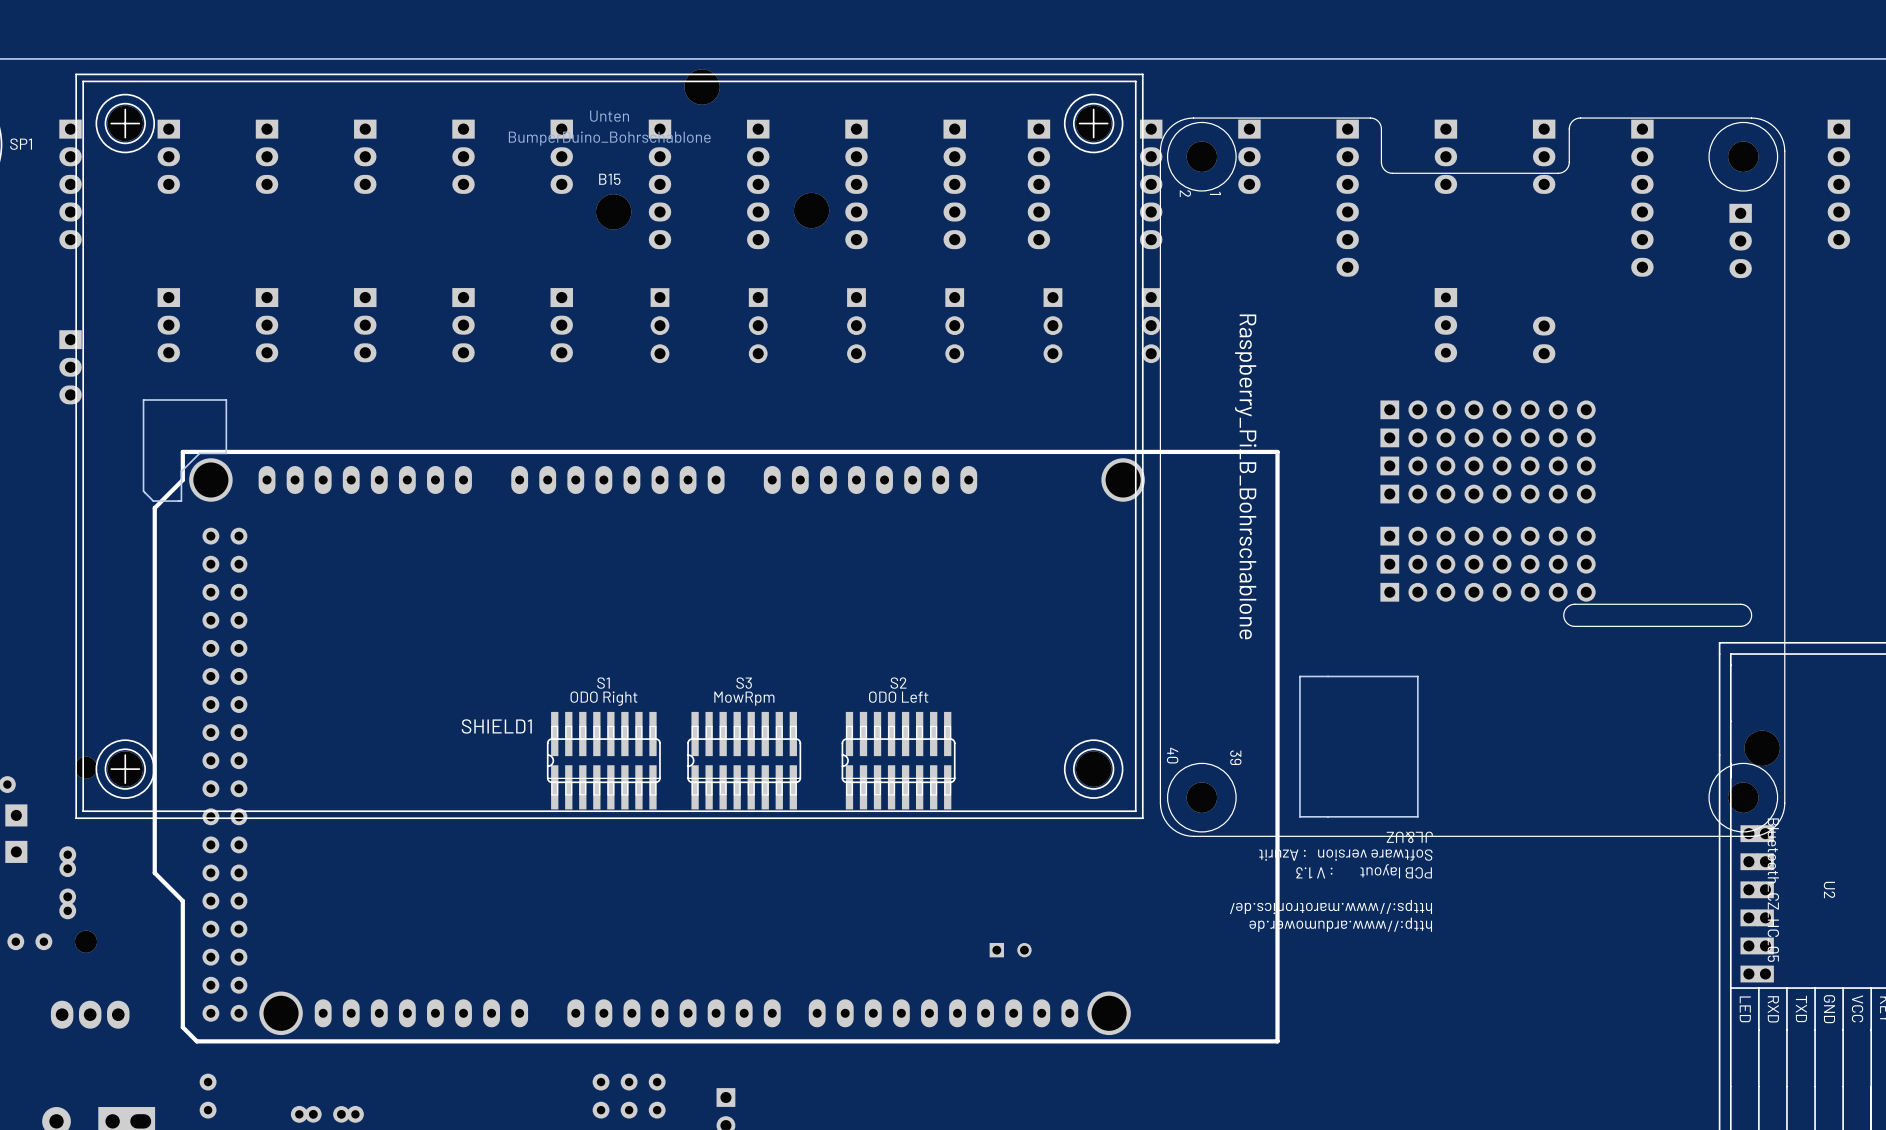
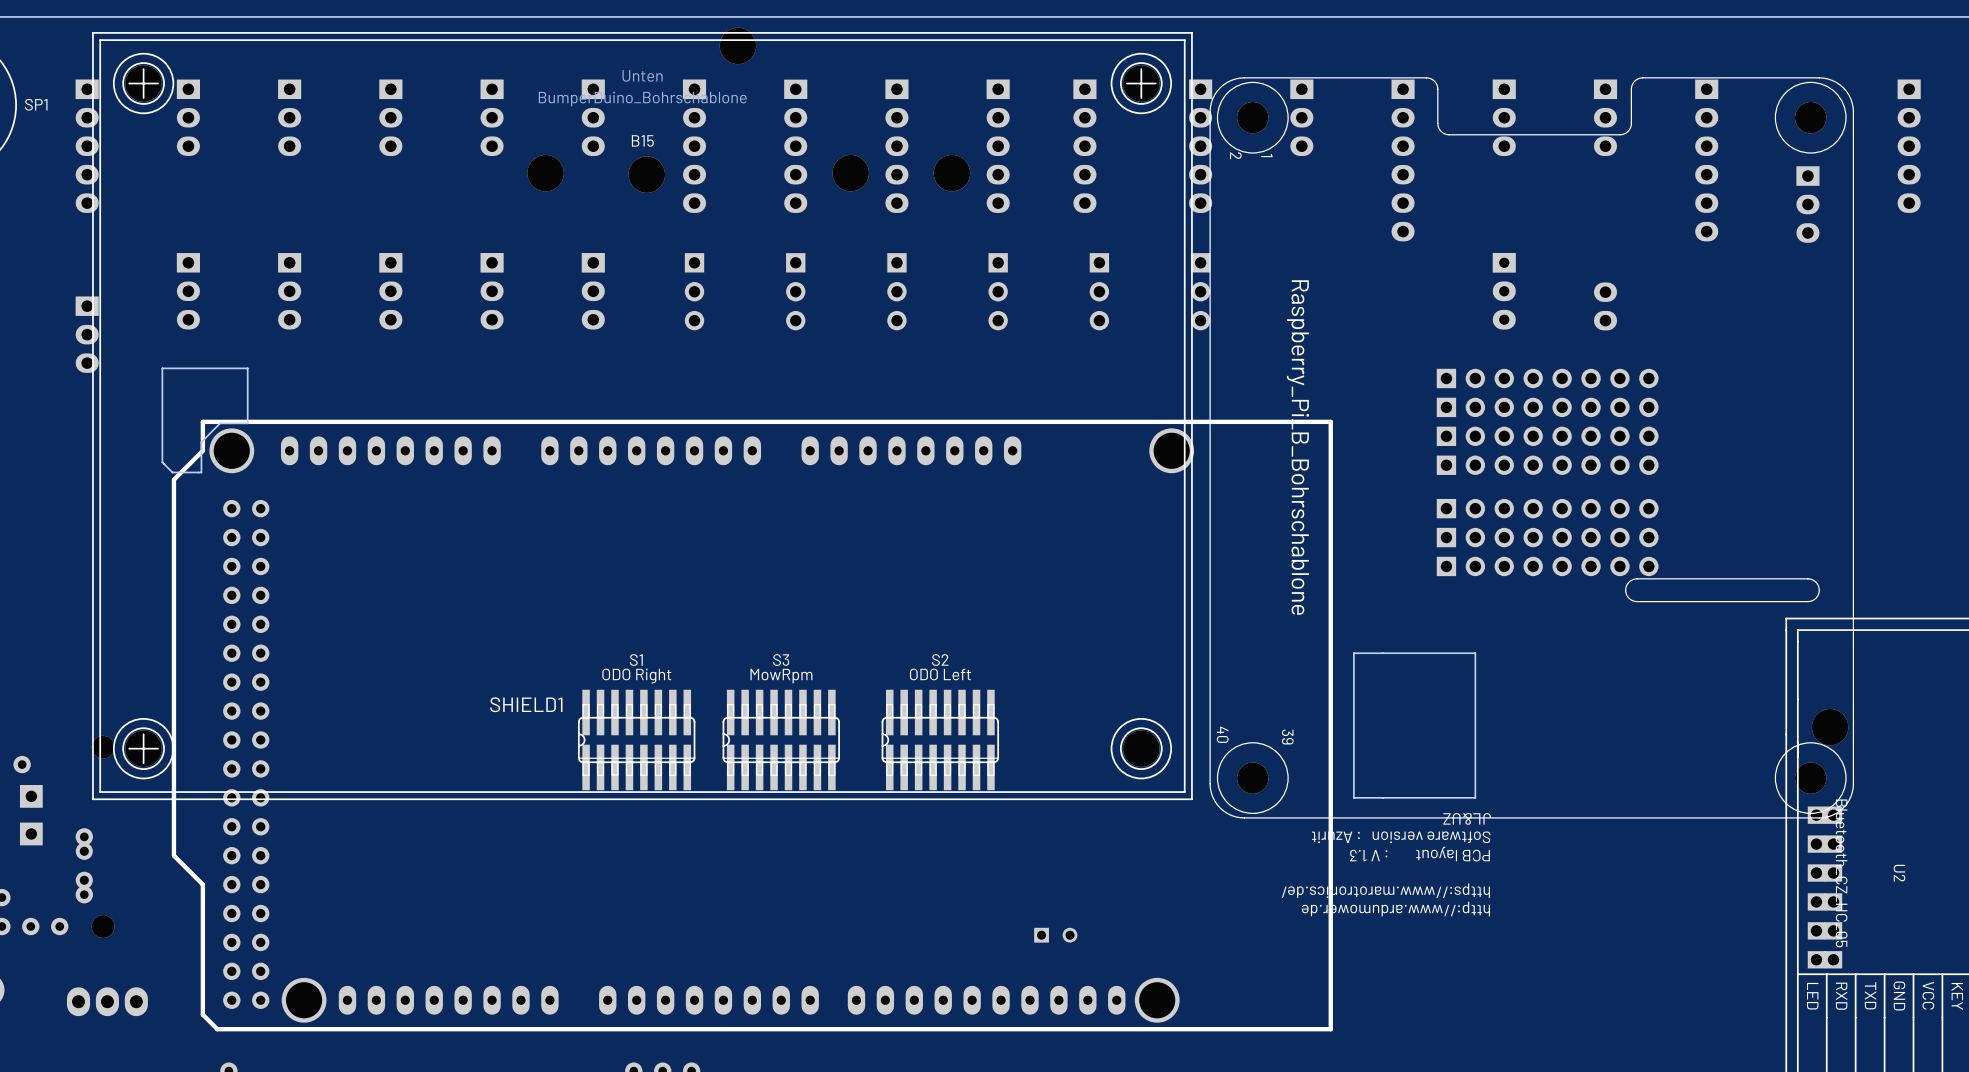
part: none -> (545, 173)
part: none -> (951, 173)

